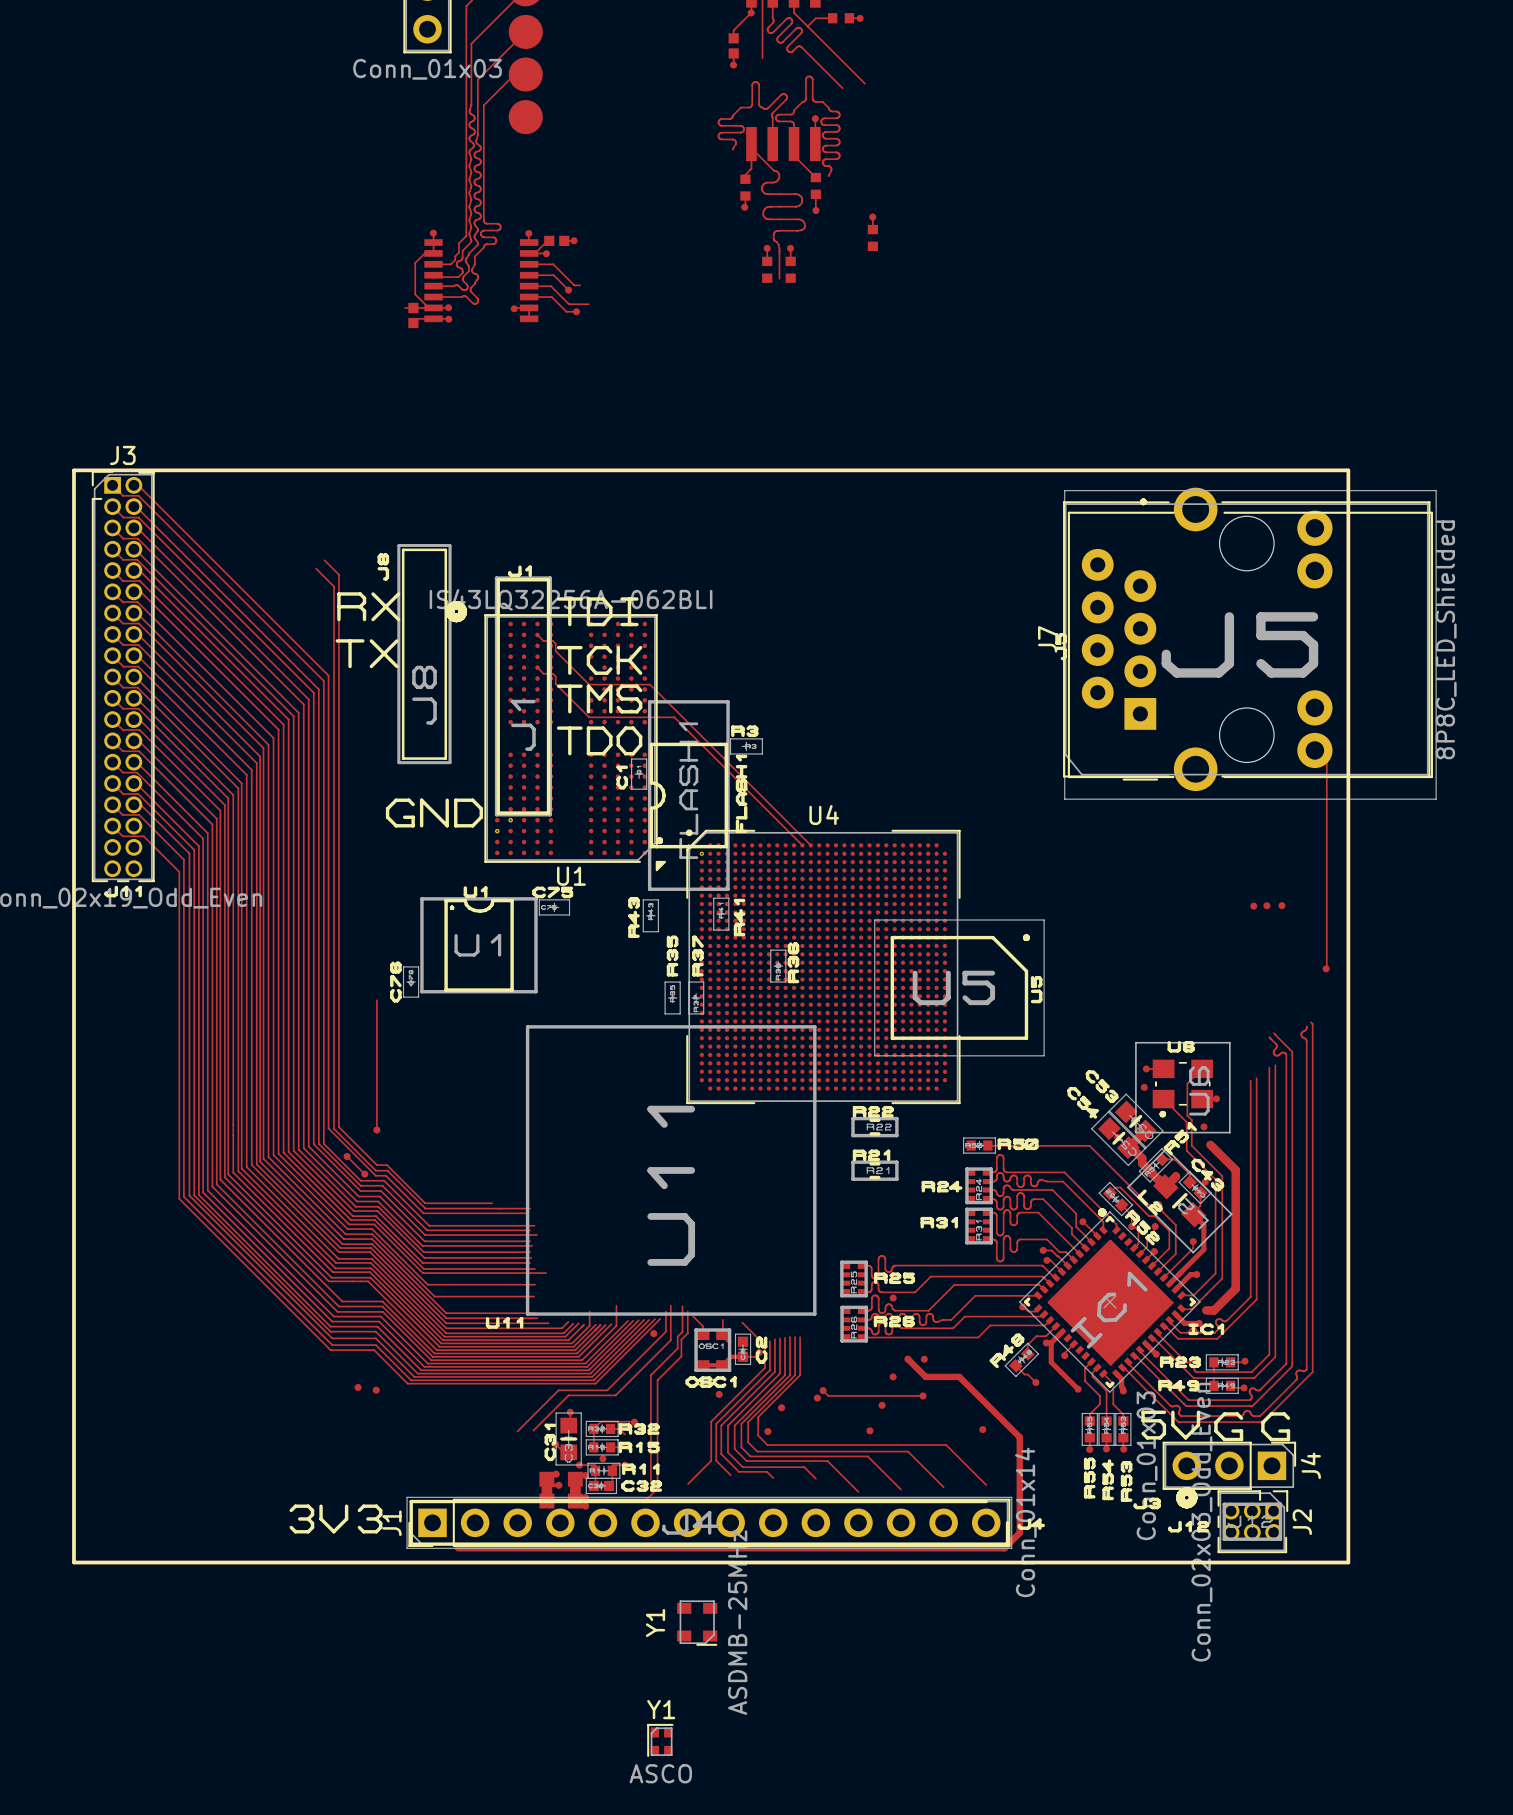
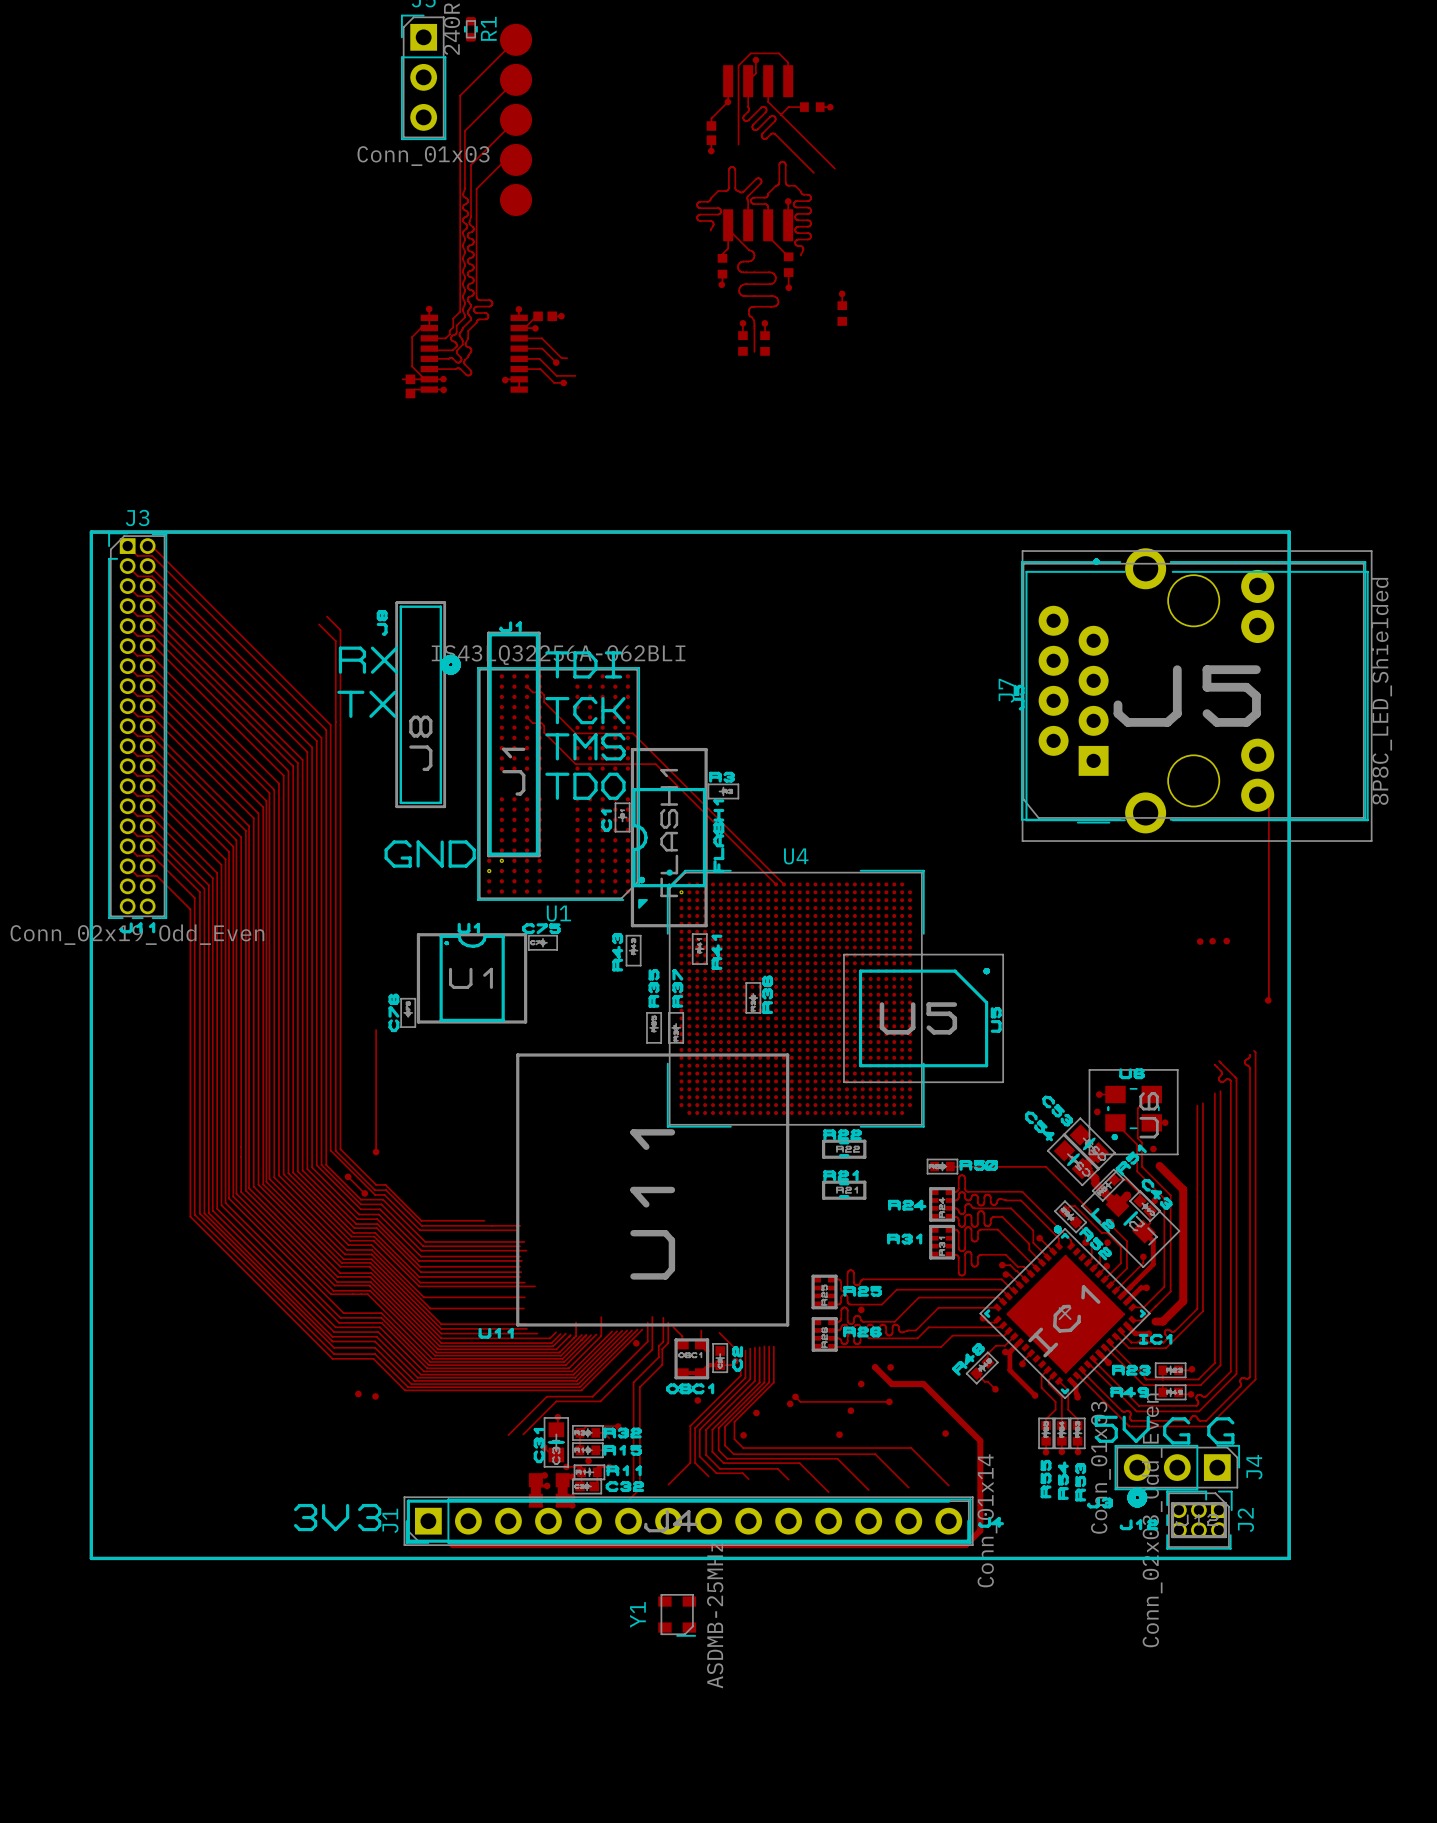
Y1: ASCO (660, 1740) -> none

